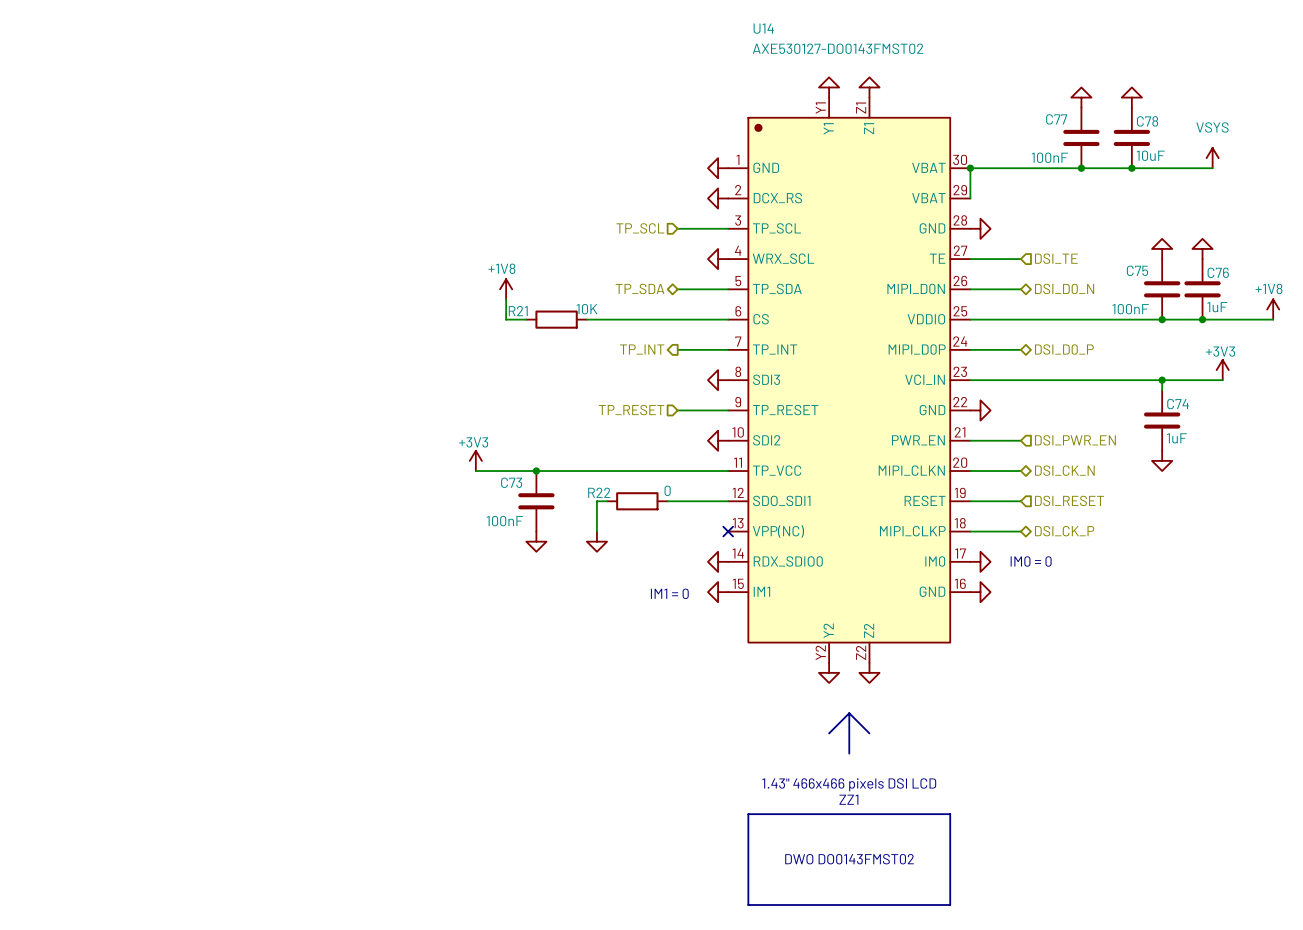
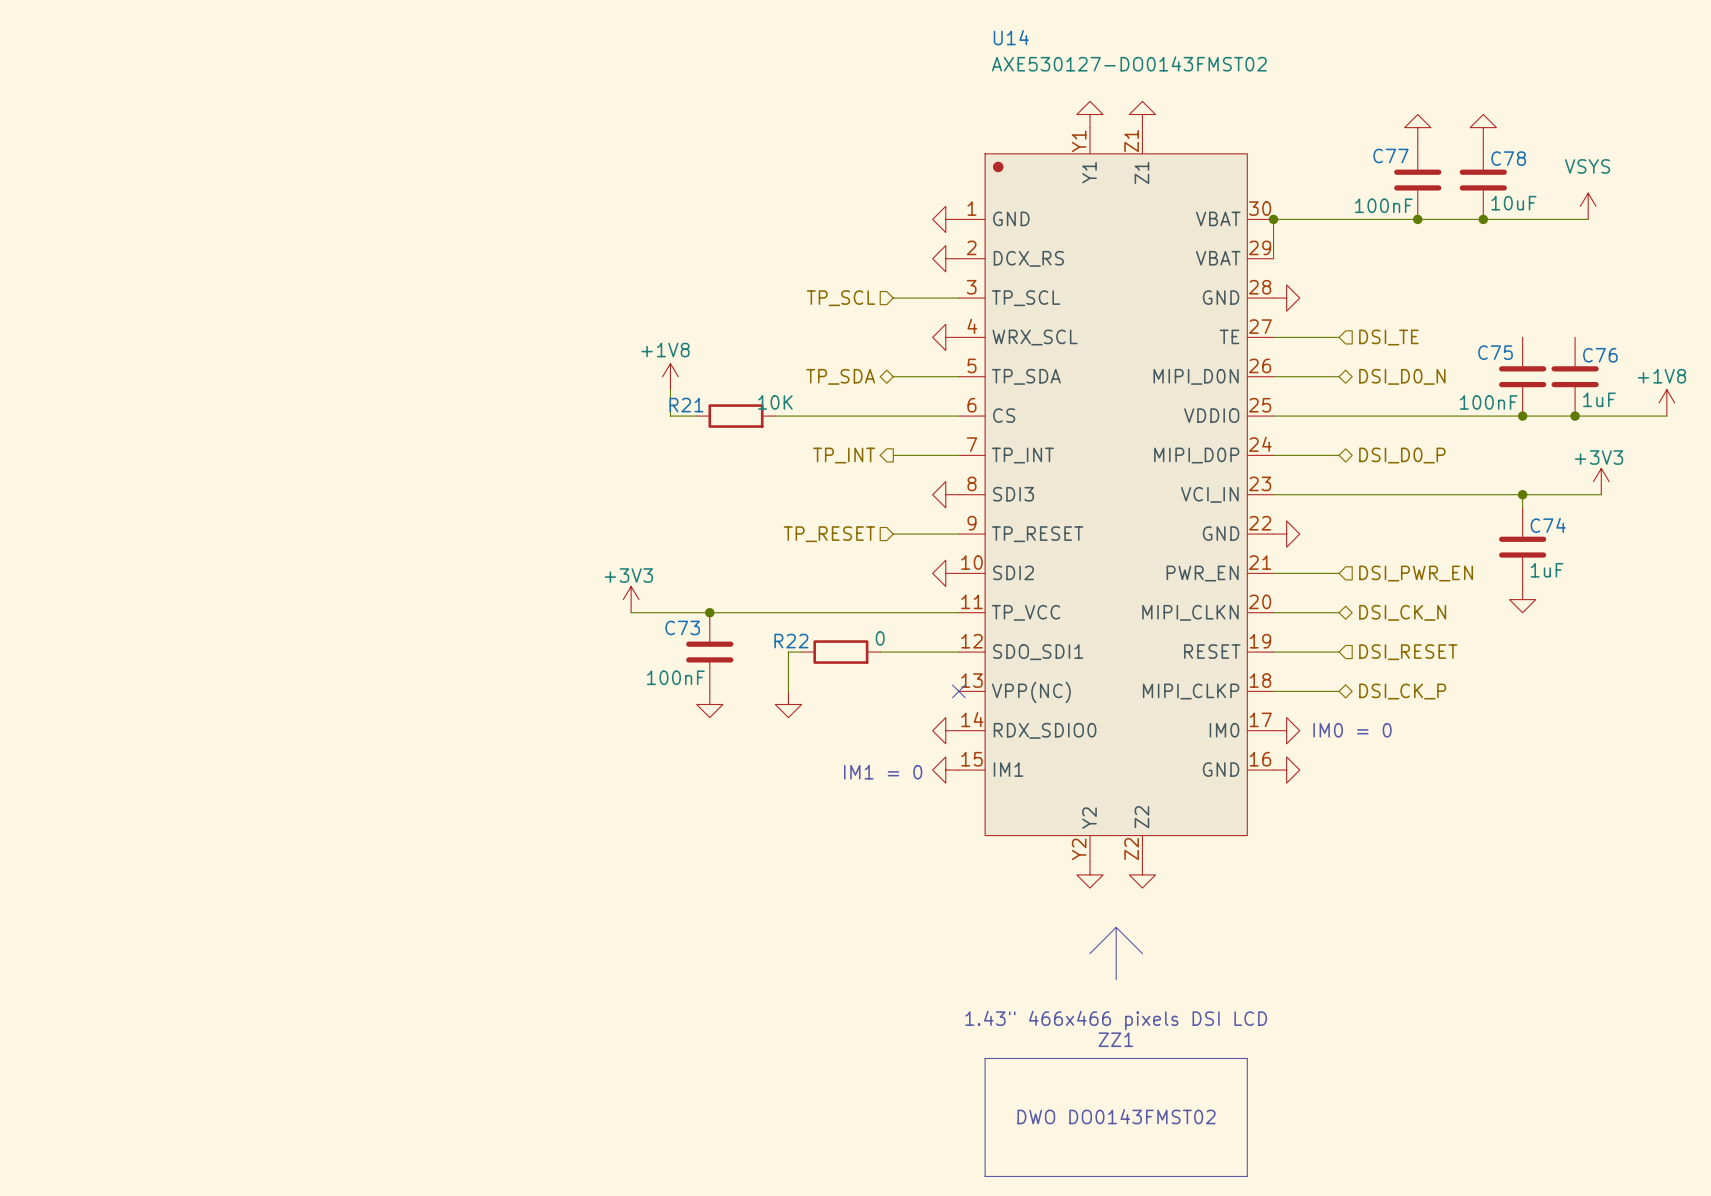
power symbol: (1162, 248) -> none
power symbol: (1202, 248) -> none

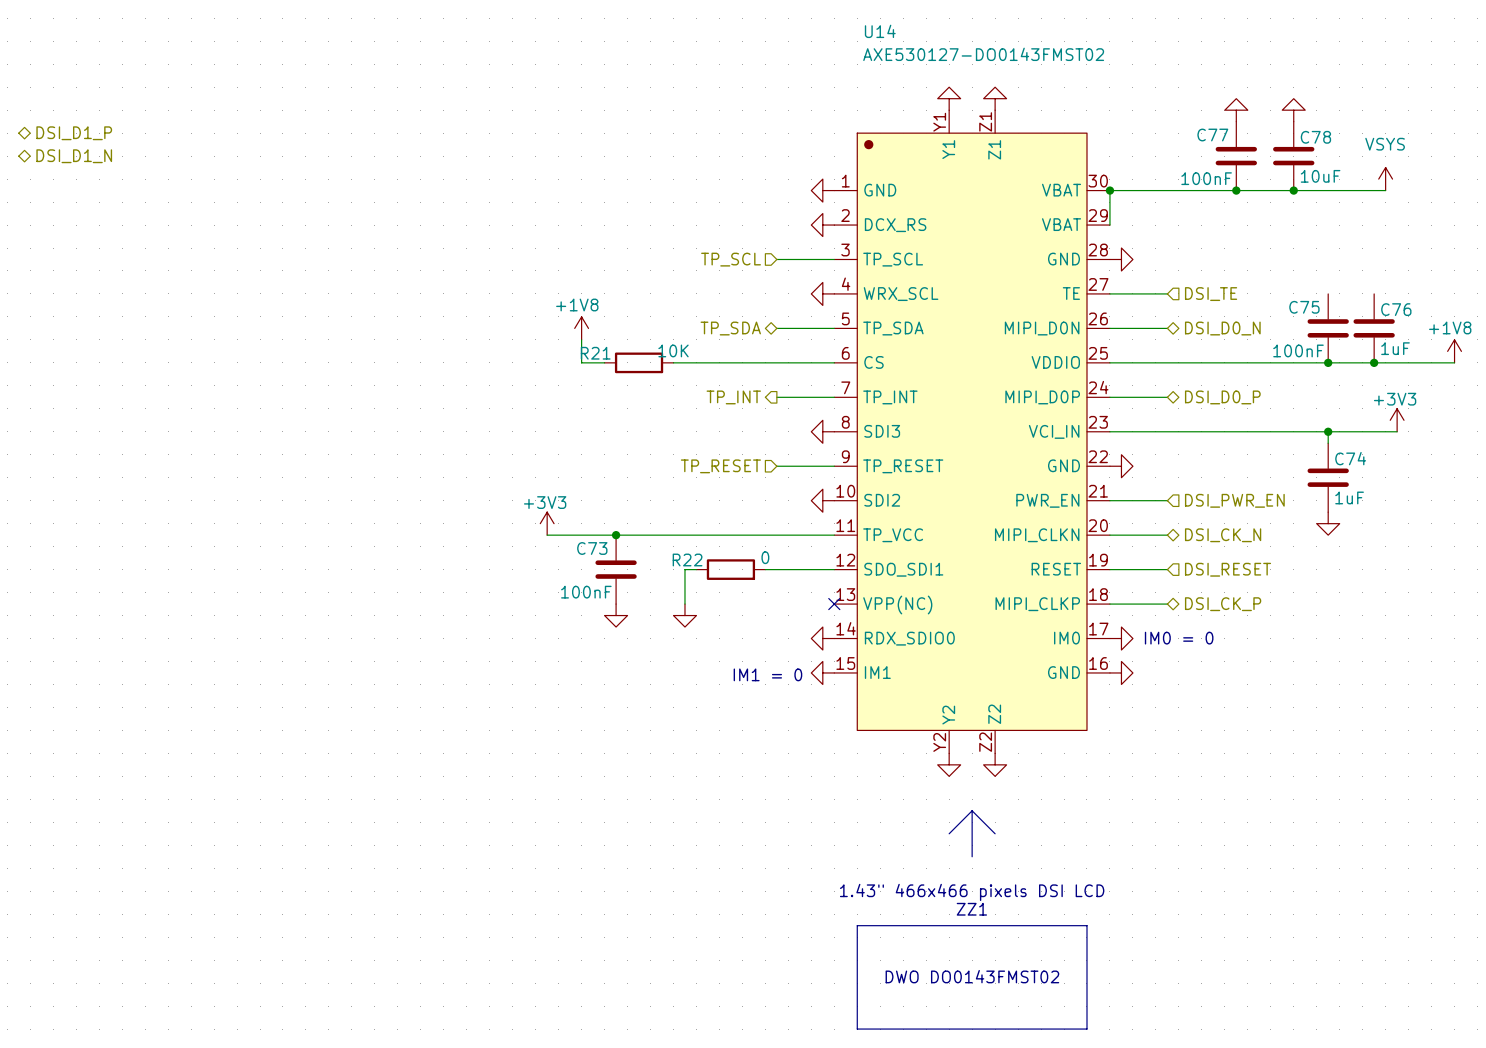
hierarchical label: none -> DSI_D1_P (74, 133)
hierarchical label: none -> DSI_D1_N (74, 156)

